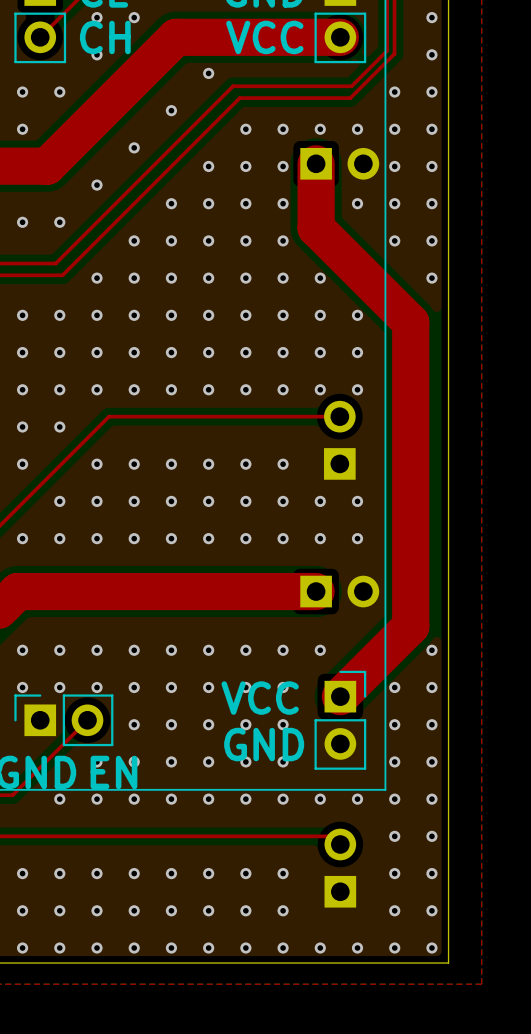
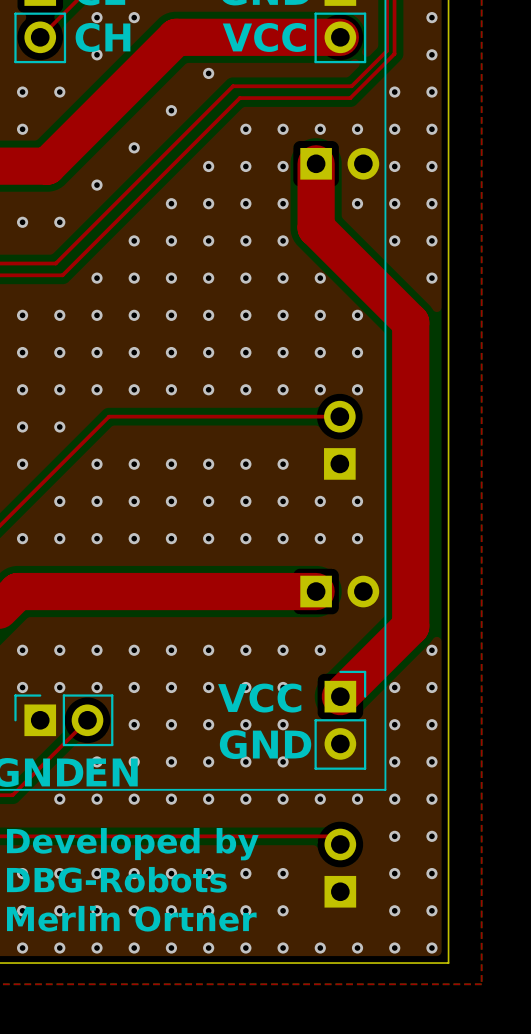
text: none -> Developed by (132, 844)
text: none -> DBG-Robots (116, 879)
text: none -> Merlin Ortner (131, 918)

